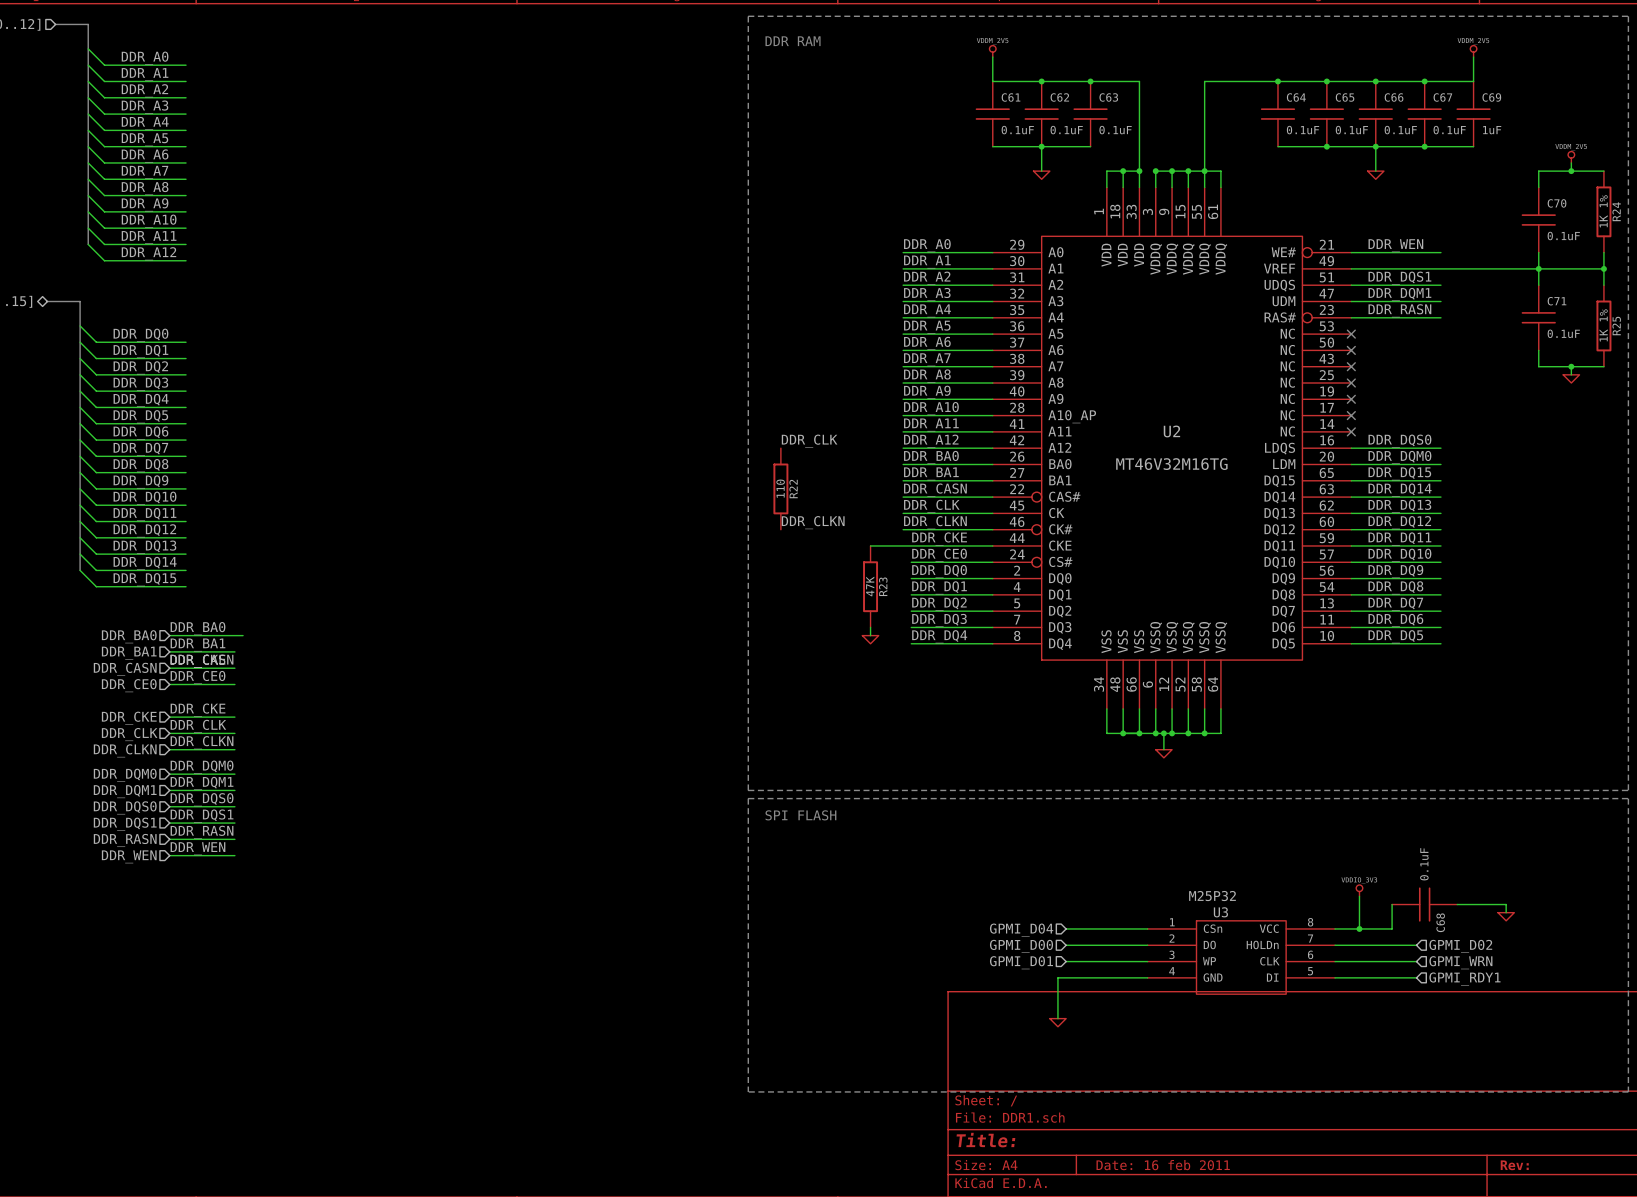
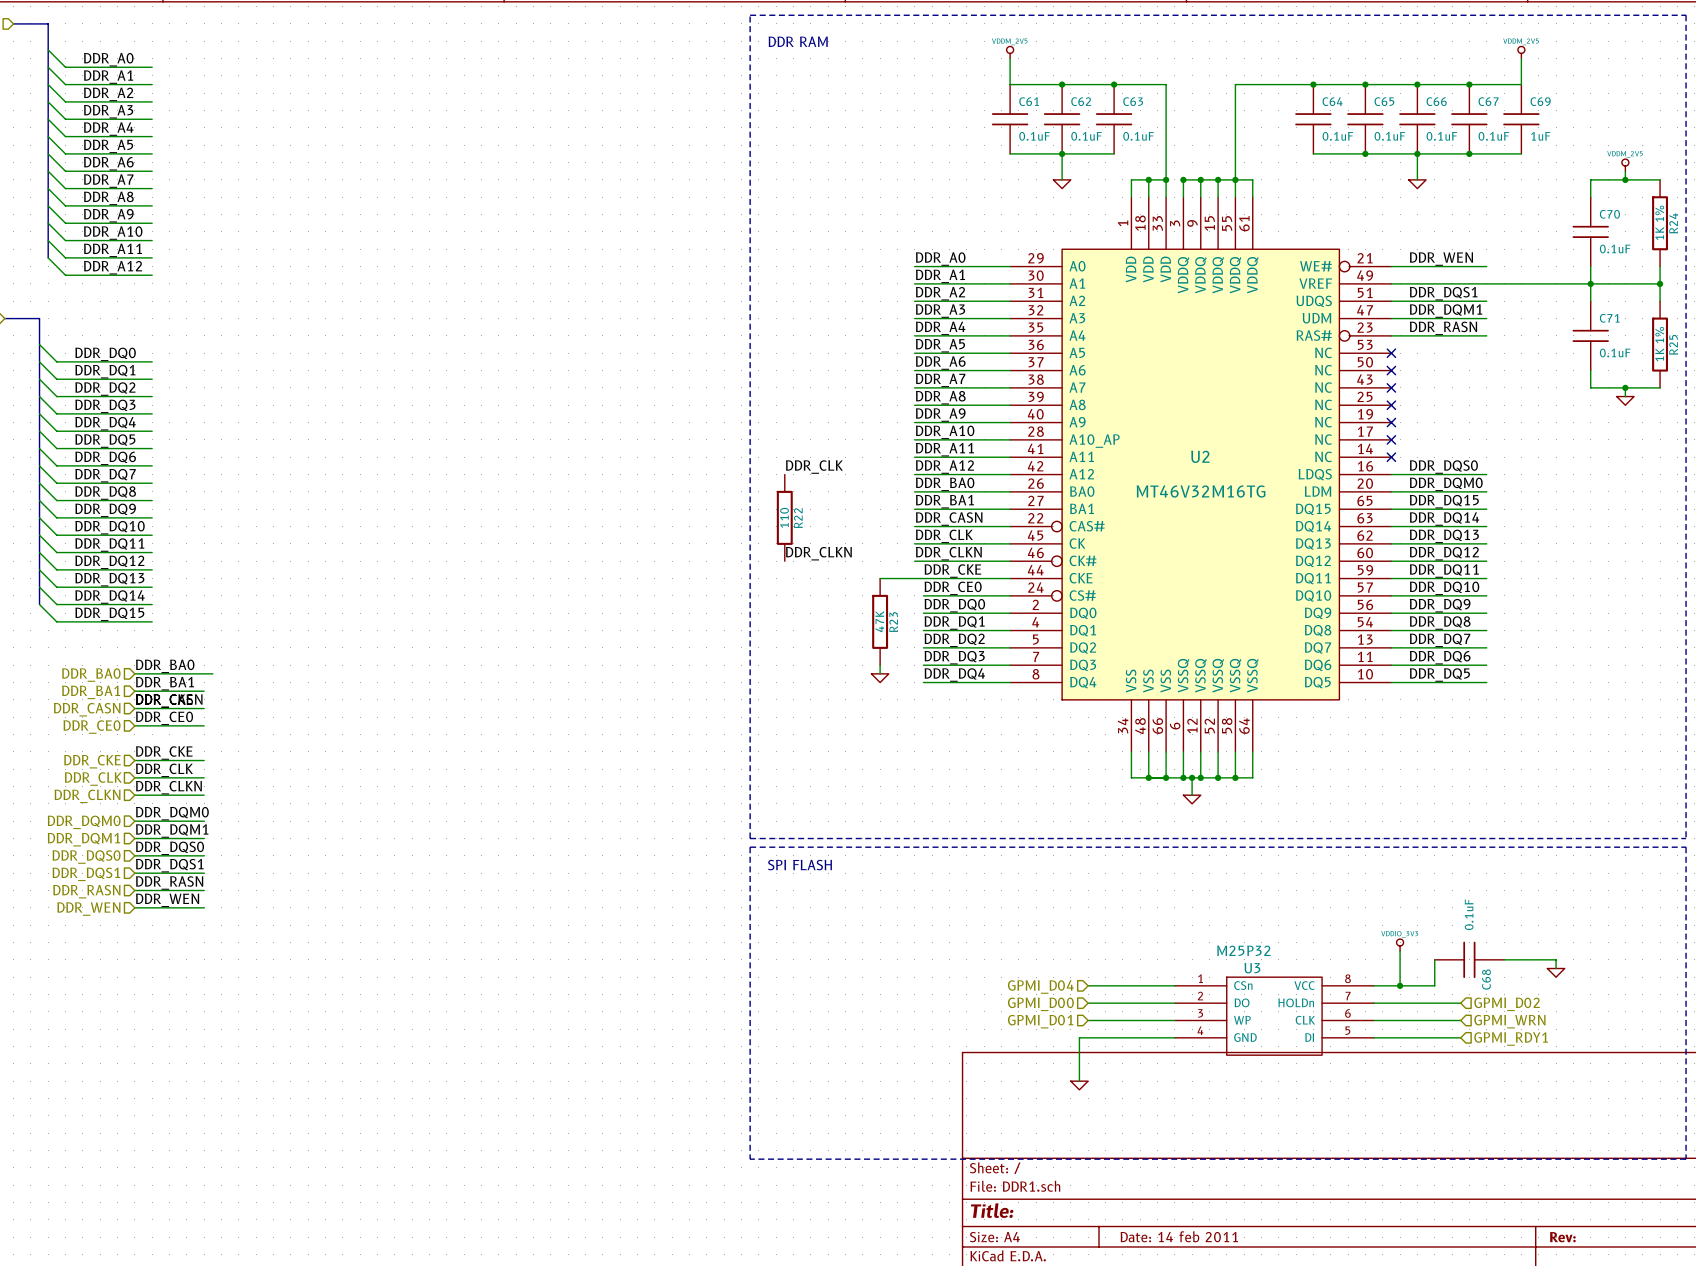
title block: Date: 16 feb 2011 (1163, 1165) -> Date: 14 feb 2011 (1179, 1236)

